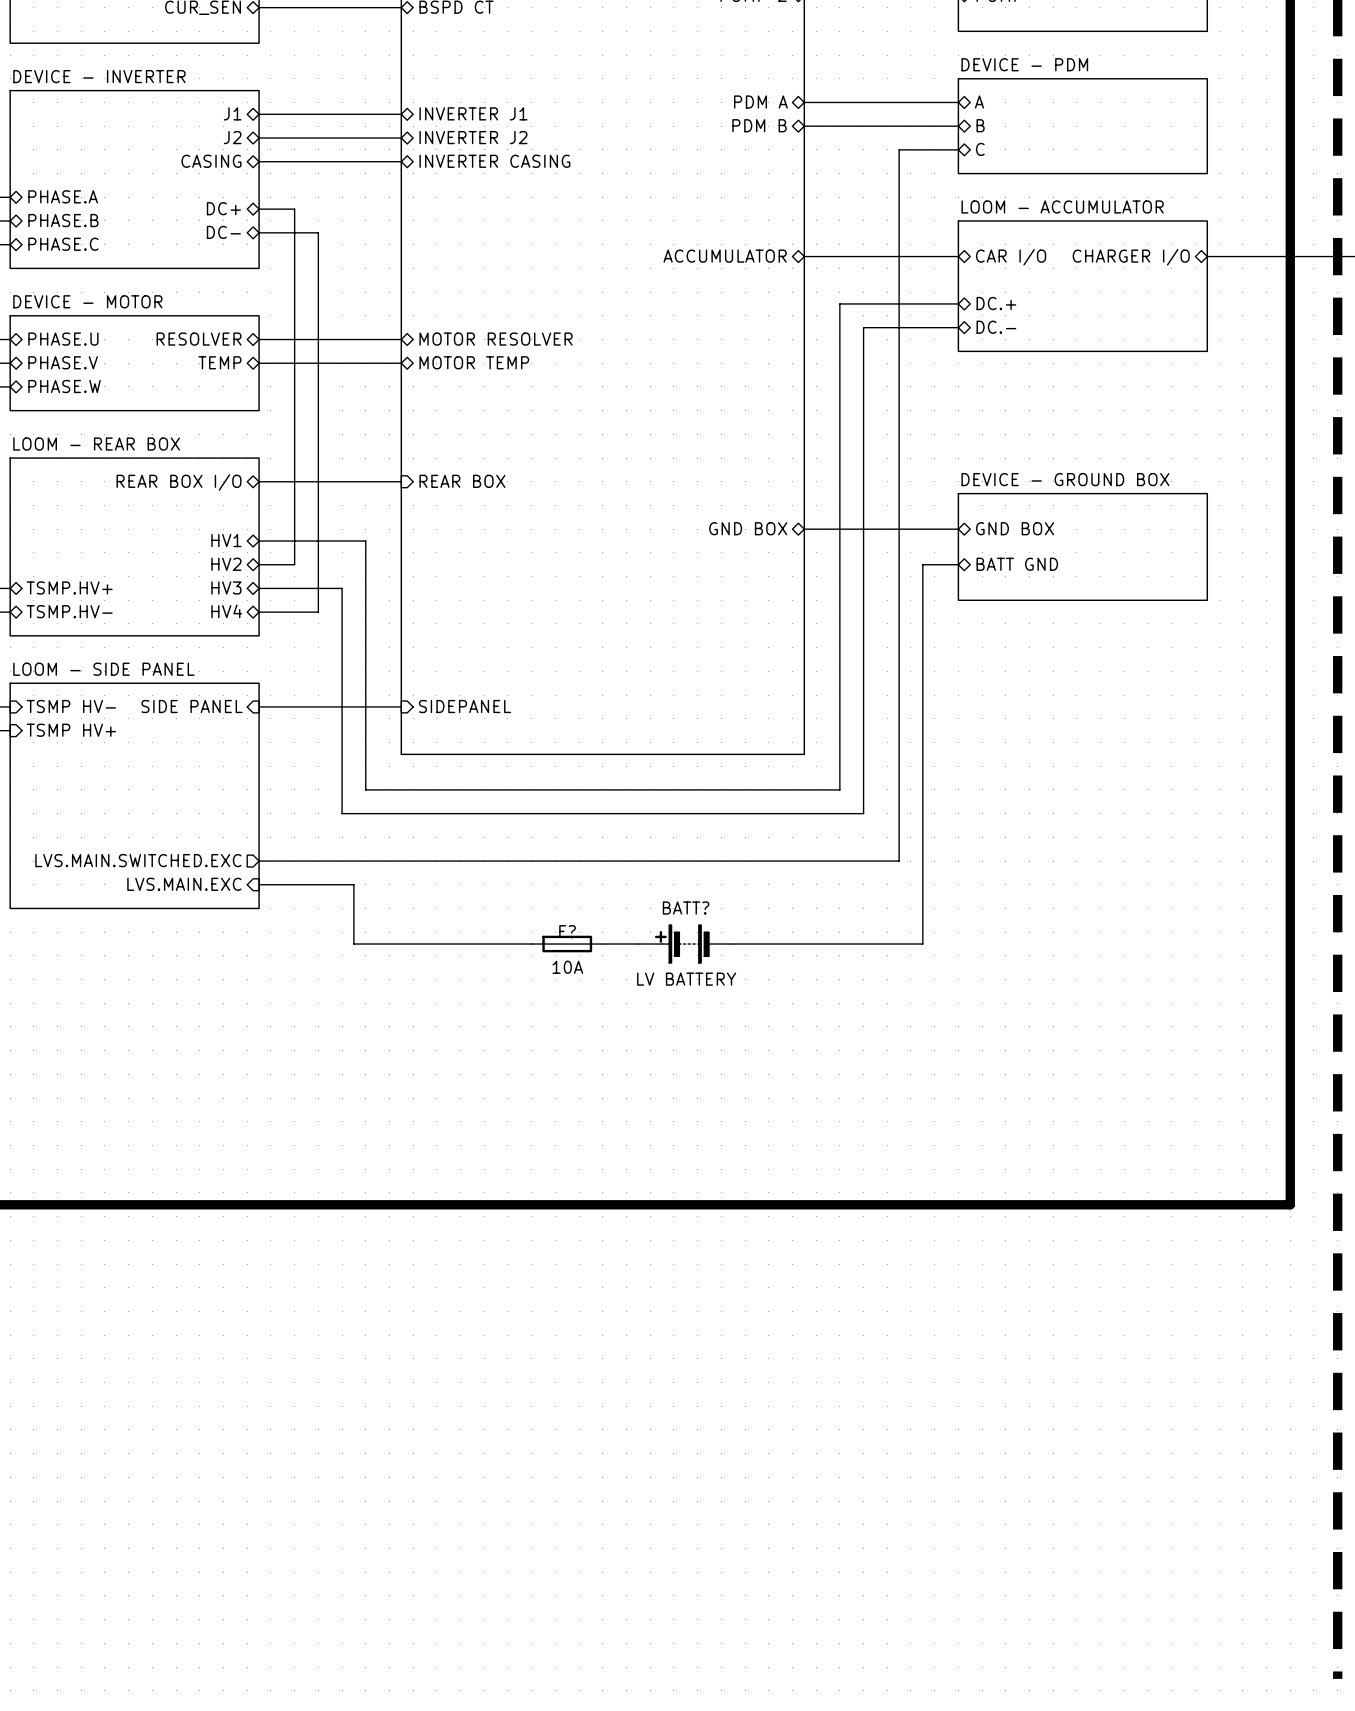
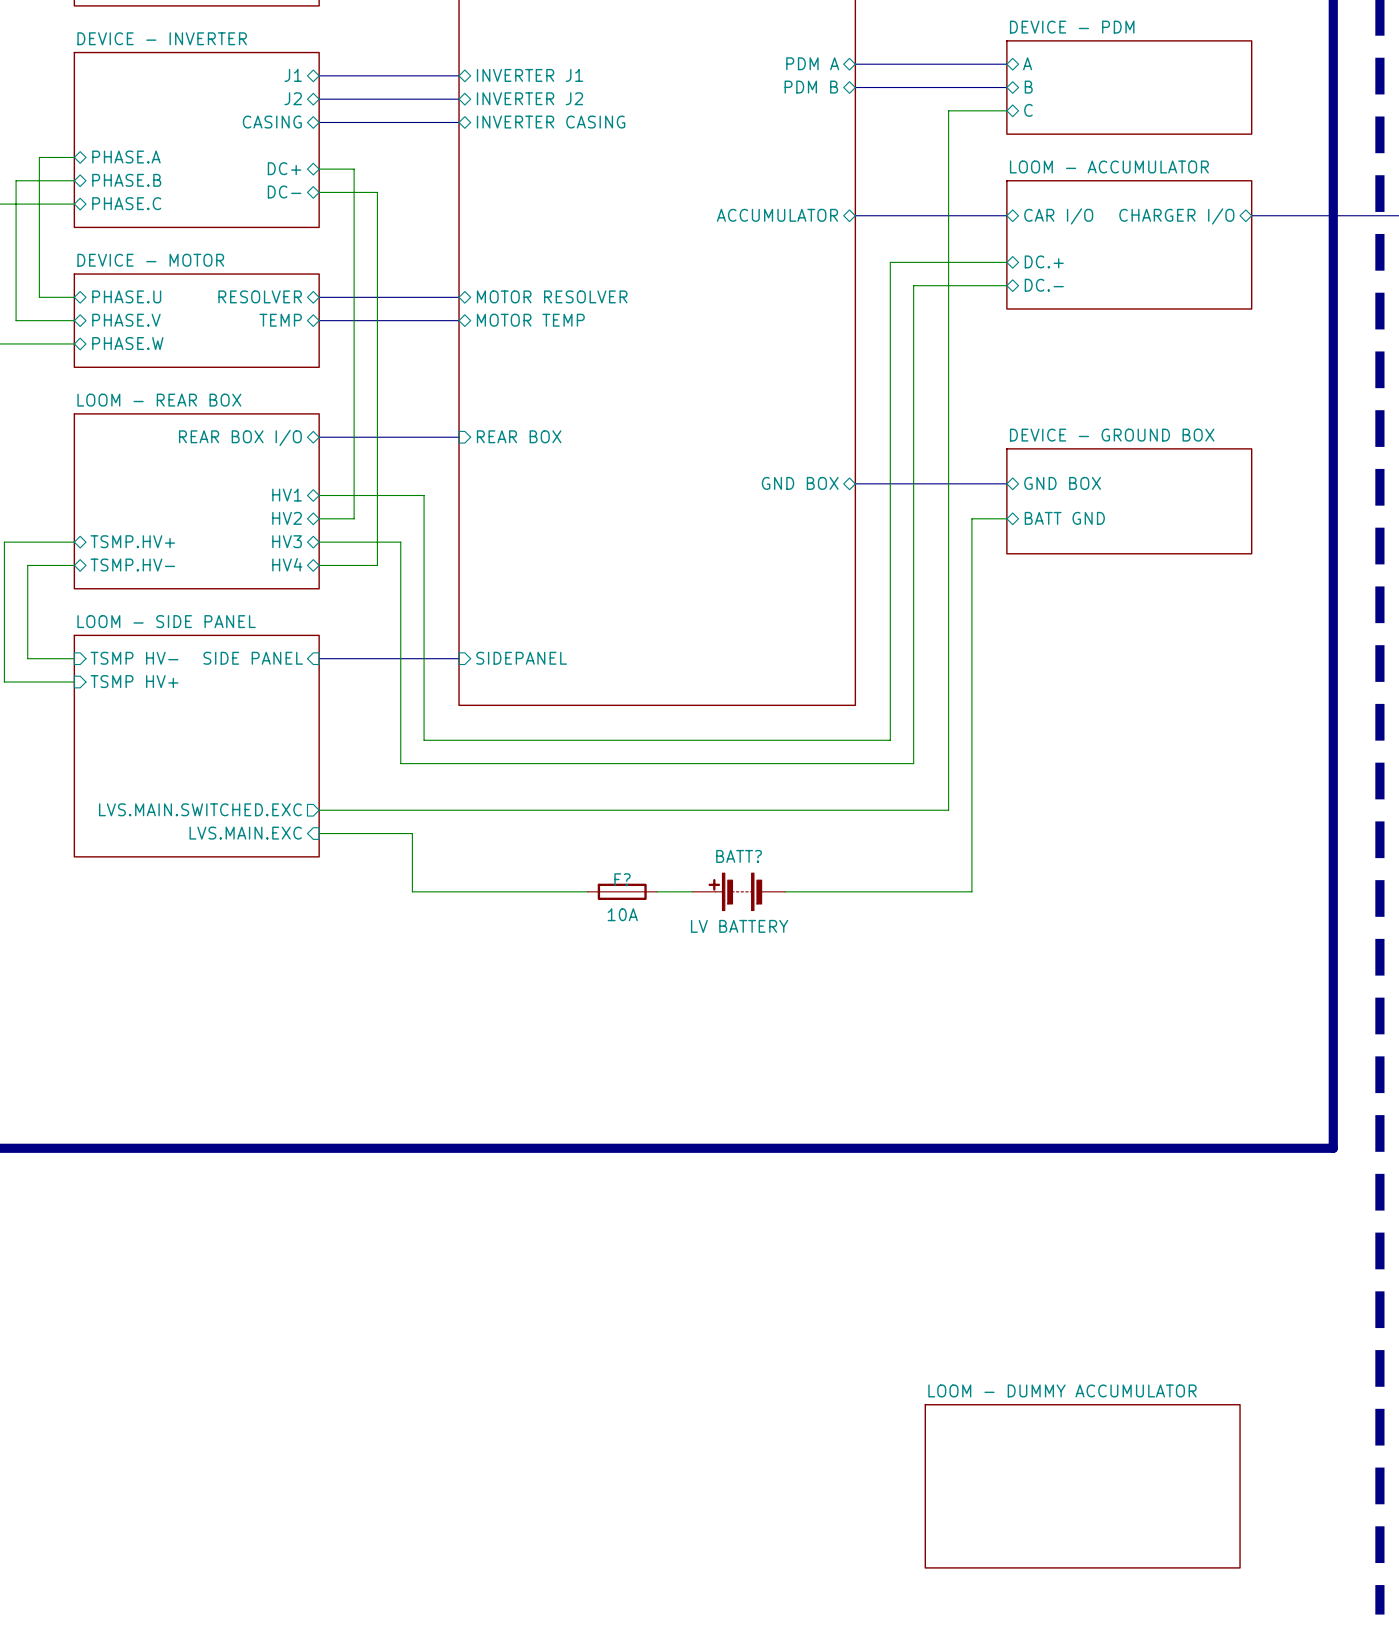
sheet LOOM - DUMMY ACCUMULATOR: none -> (1082, 1486)

